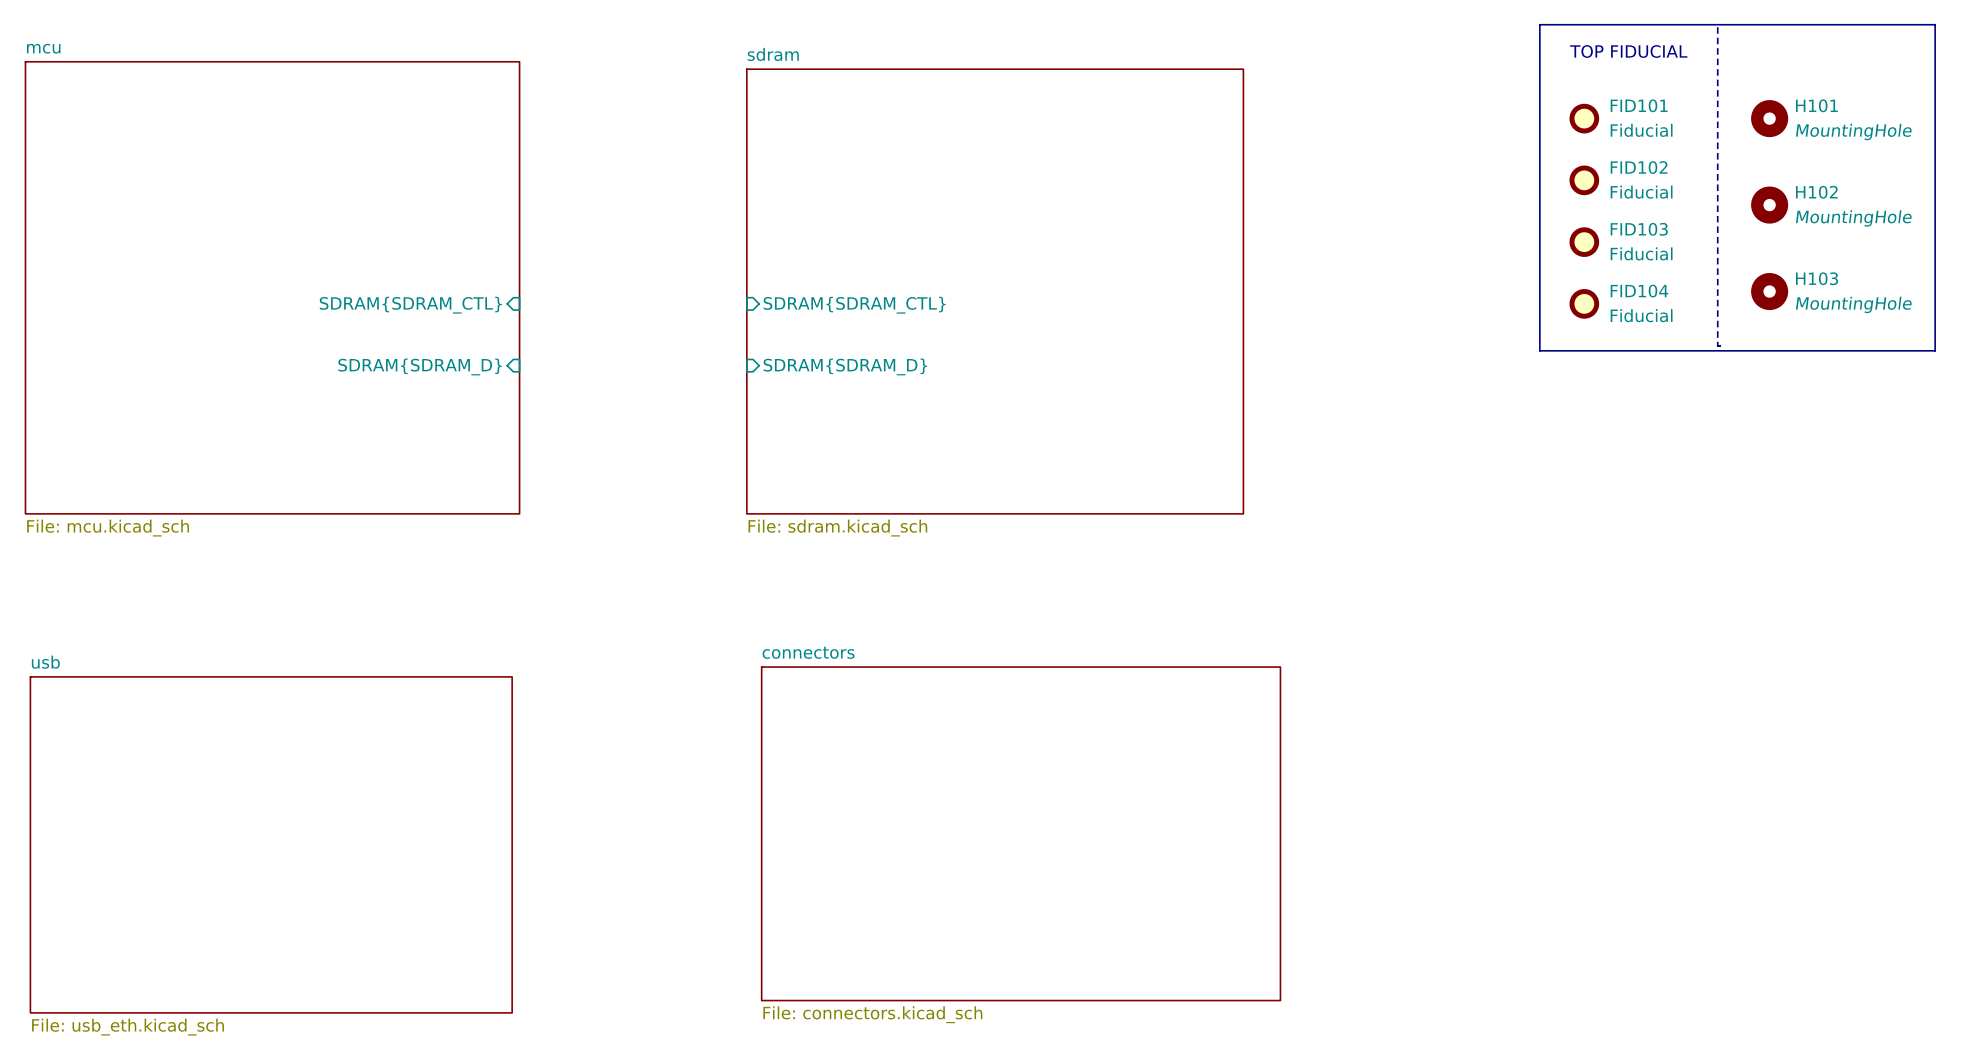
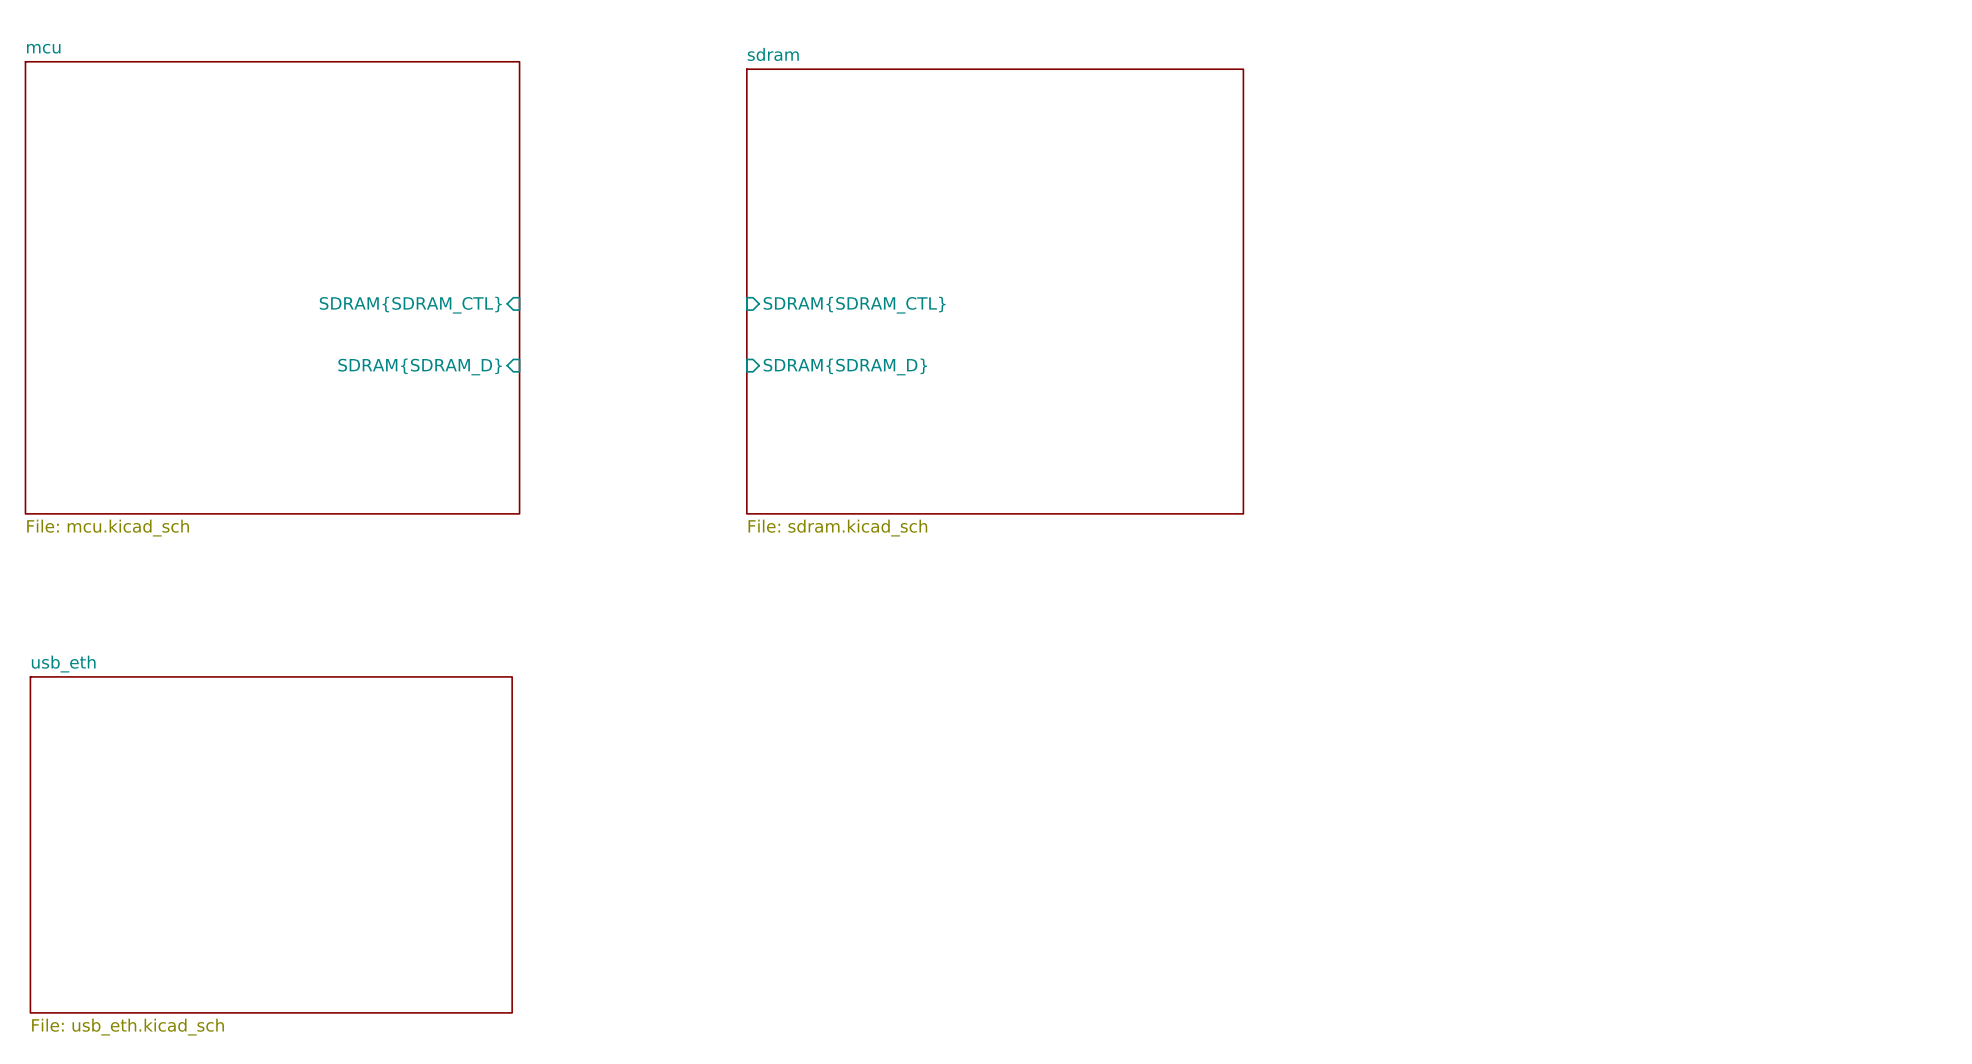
line: (1539, 24) (1935, 24) (1935, 350) (1539, 350) (1539, 24) -> none
line: (1717, 27) (1717, 345) (1720, 345) -> none
text: TOP FIDUCIAL (1628, 51) -> none
FID101: Fiducial (1584, 118) -> none
H101: MountingHole (1769, 118) -> none
FID102: Fiducial (1584, 180) -> none
H102: MountingHole (1769, 205) -> none
FID103: Fiducial (1584, 242) -> none
H103: MountingHole (1769, 291) -> none
FID104: Fiducial (1584, 303) -> none
sheet usb name: usb (45, 662) -> usb_eth (63, 664)
sheet connectors: File: connectors.kicad_sch (1021, 833) -> none

